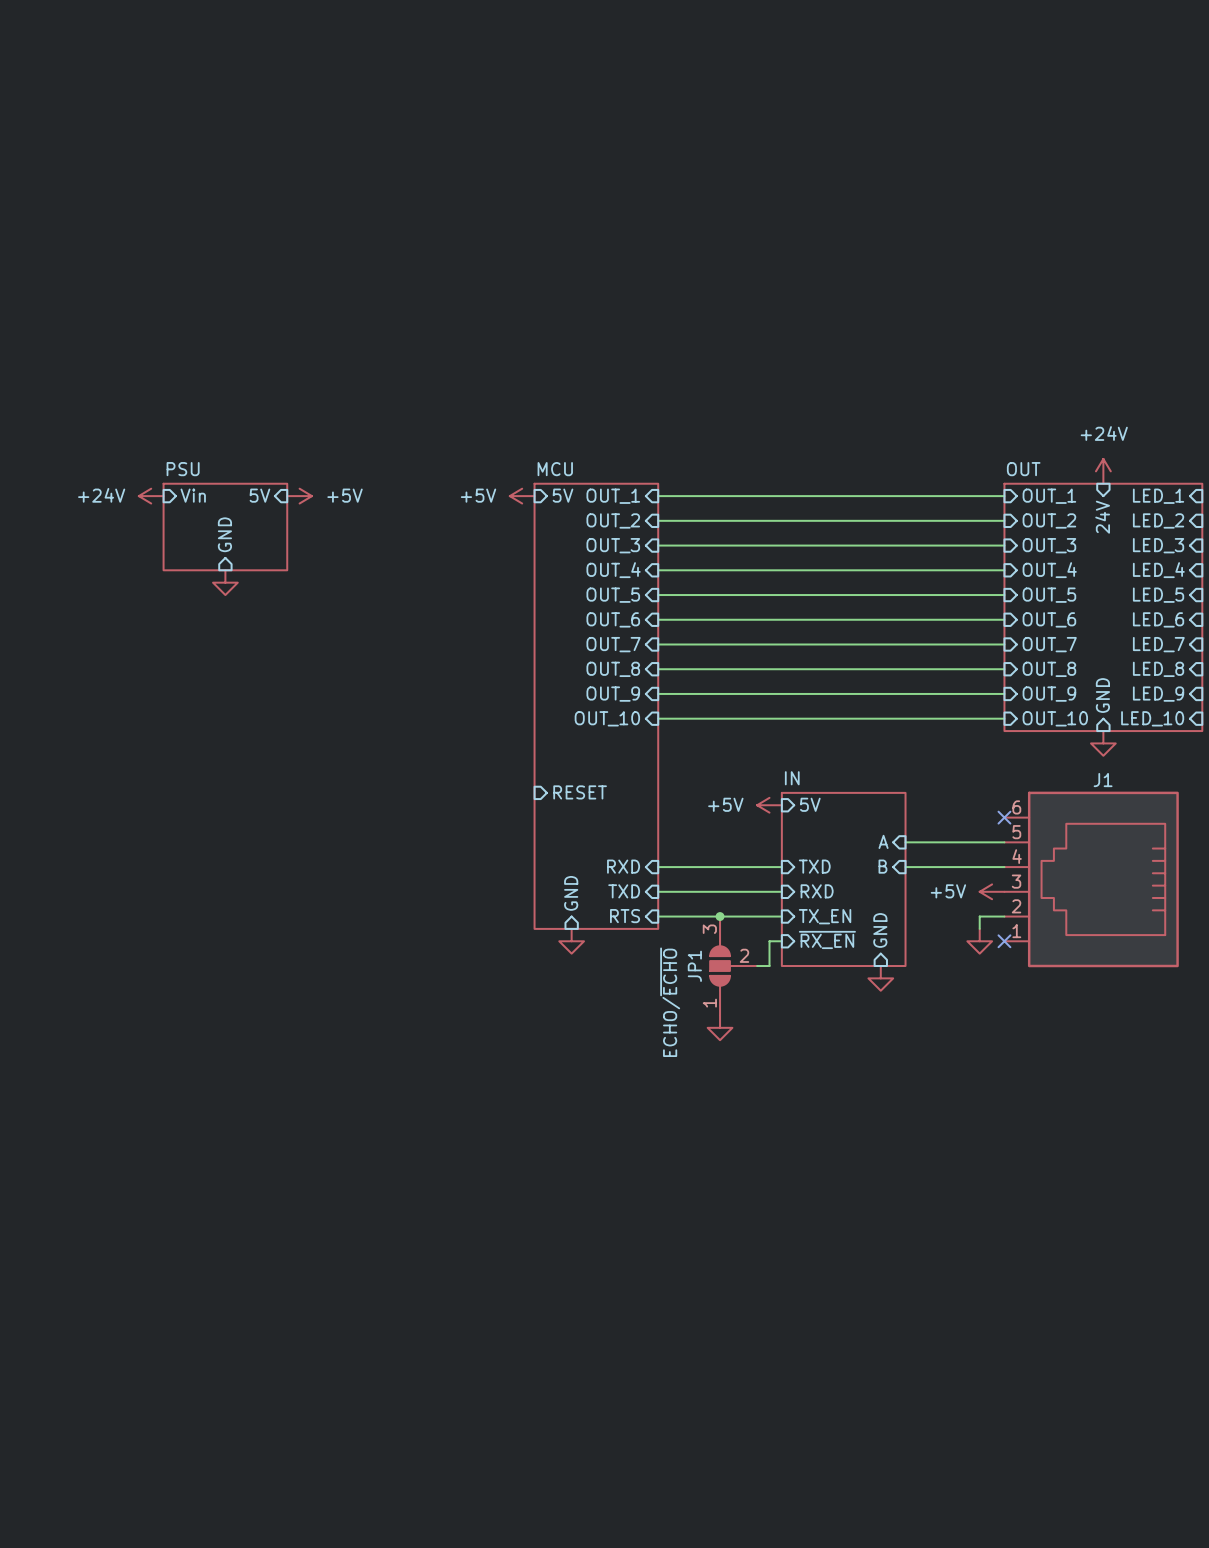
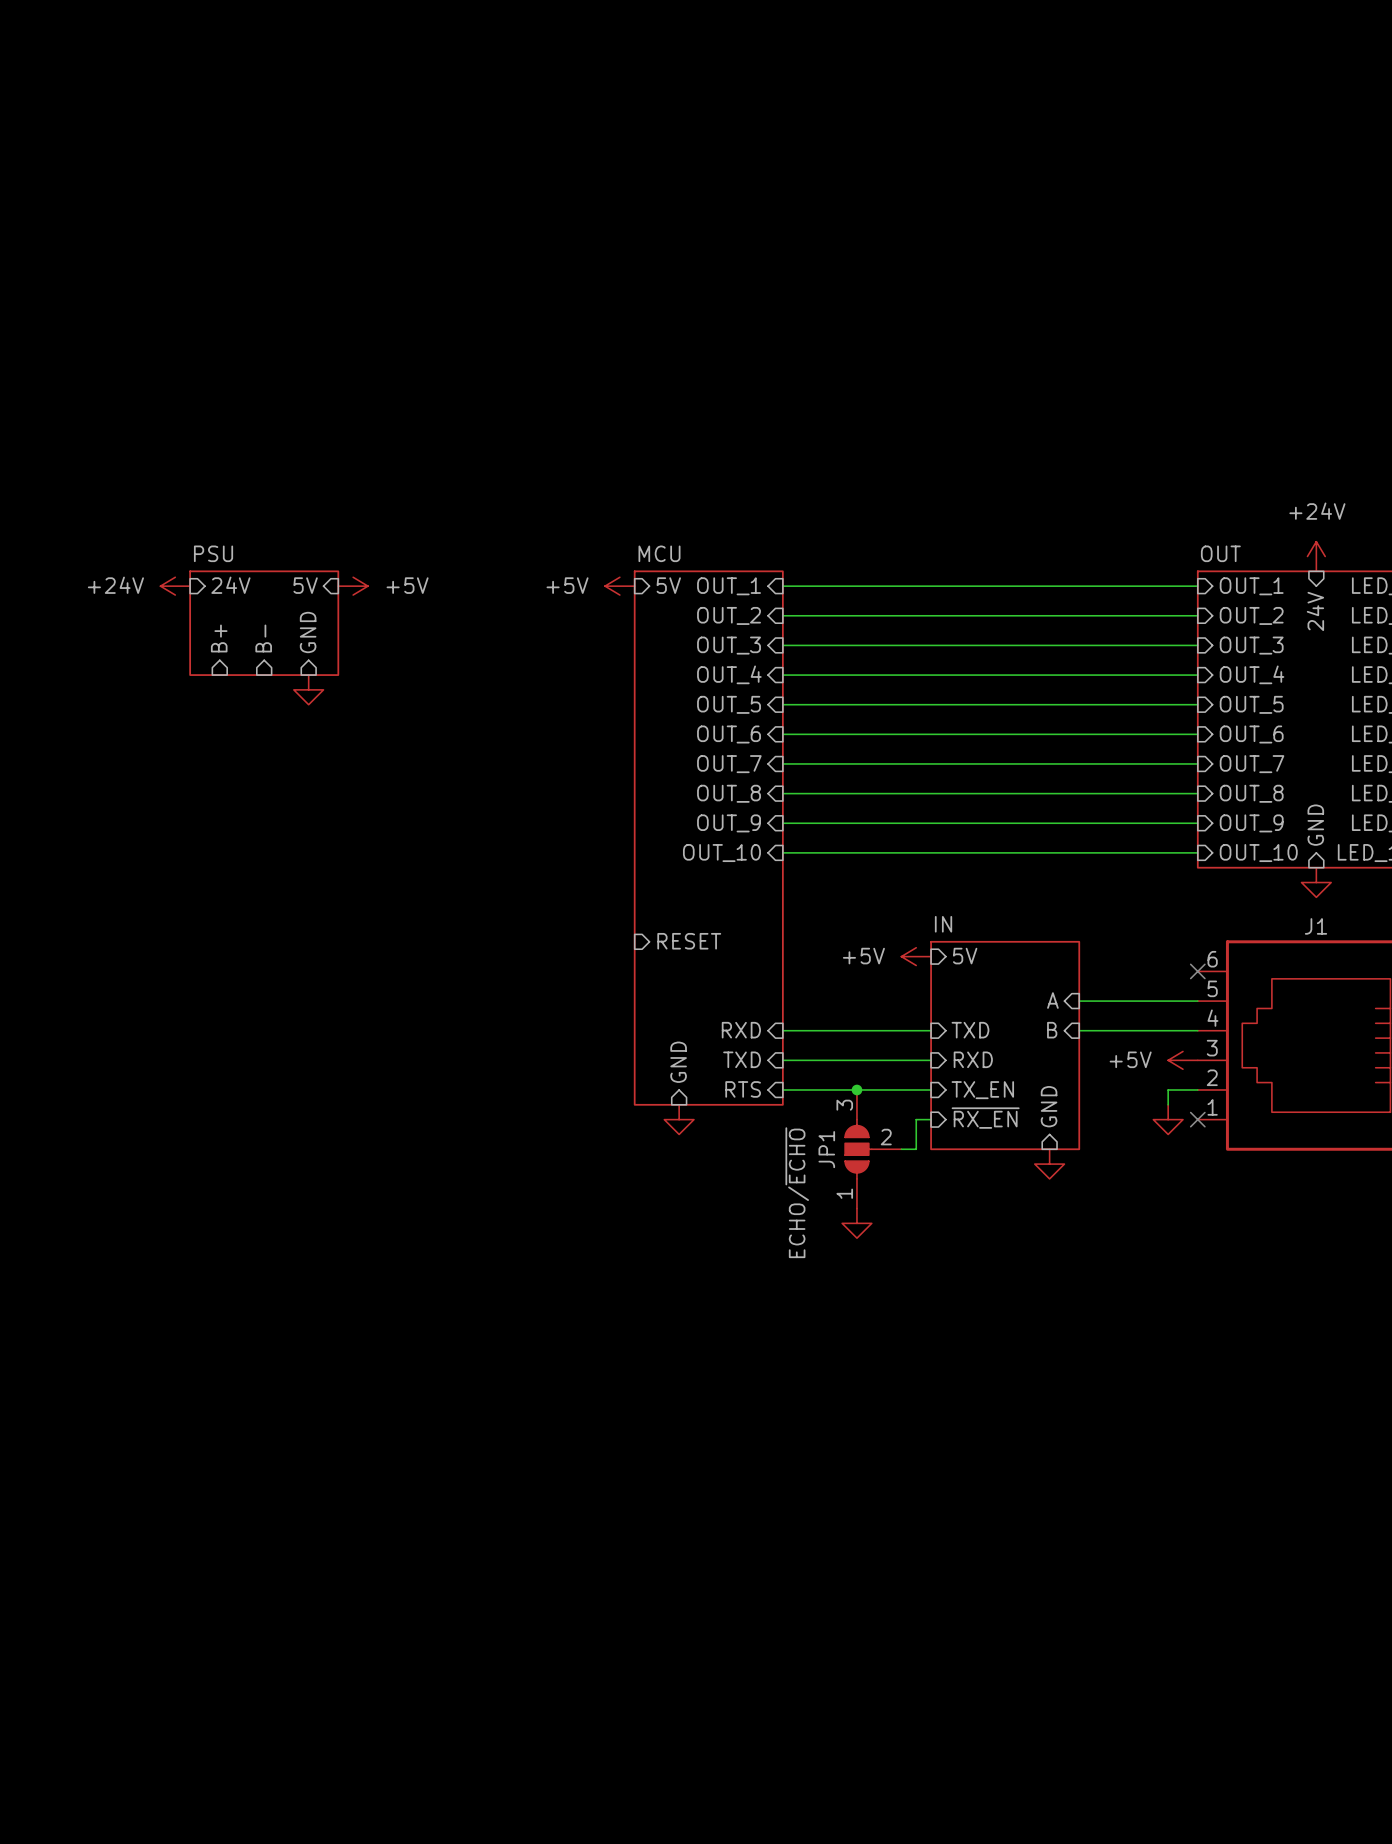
sheet pin: Vin (193, 495) -> 24V (230, 585)
sheet pin: GND (224, 534) -> B- (263, 638)
sheet pin: none -> GND (308, 632)
sheet pin: none -> B+ (219, 638)
power symbol position: (225, 582) -> (308, 689)

